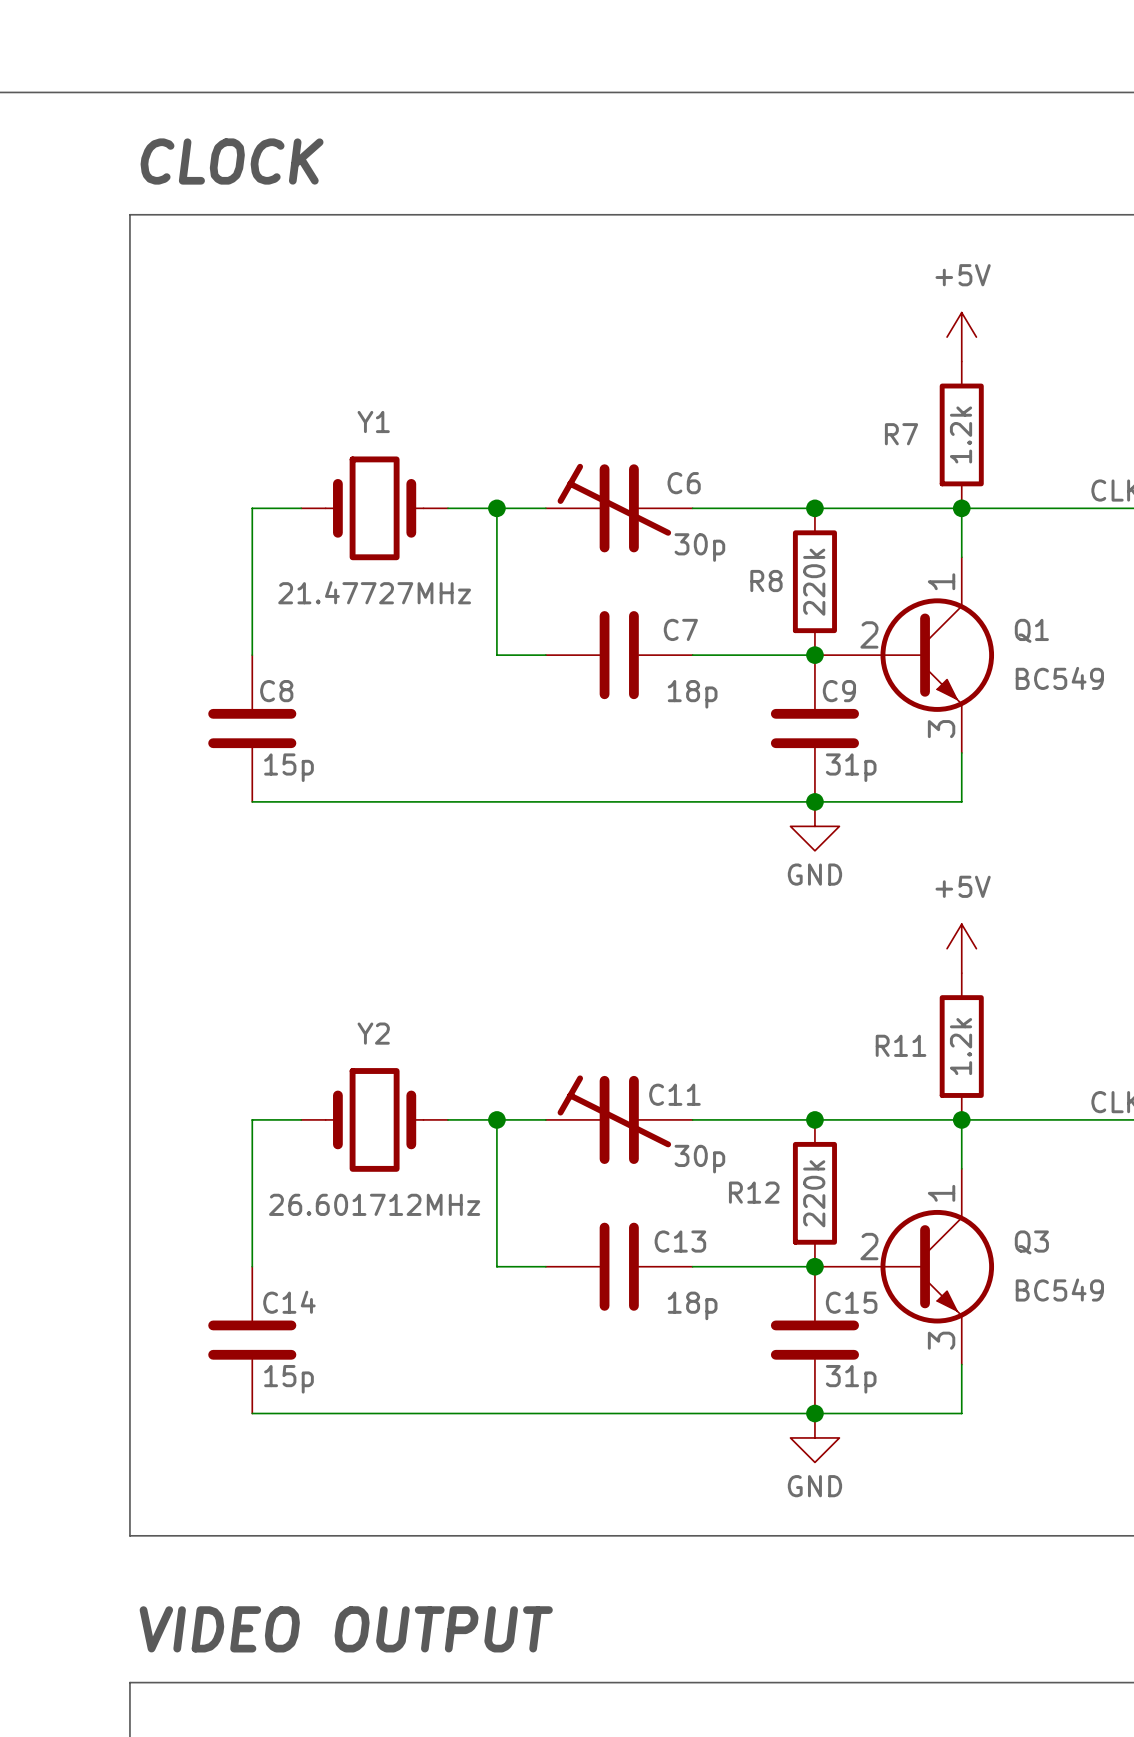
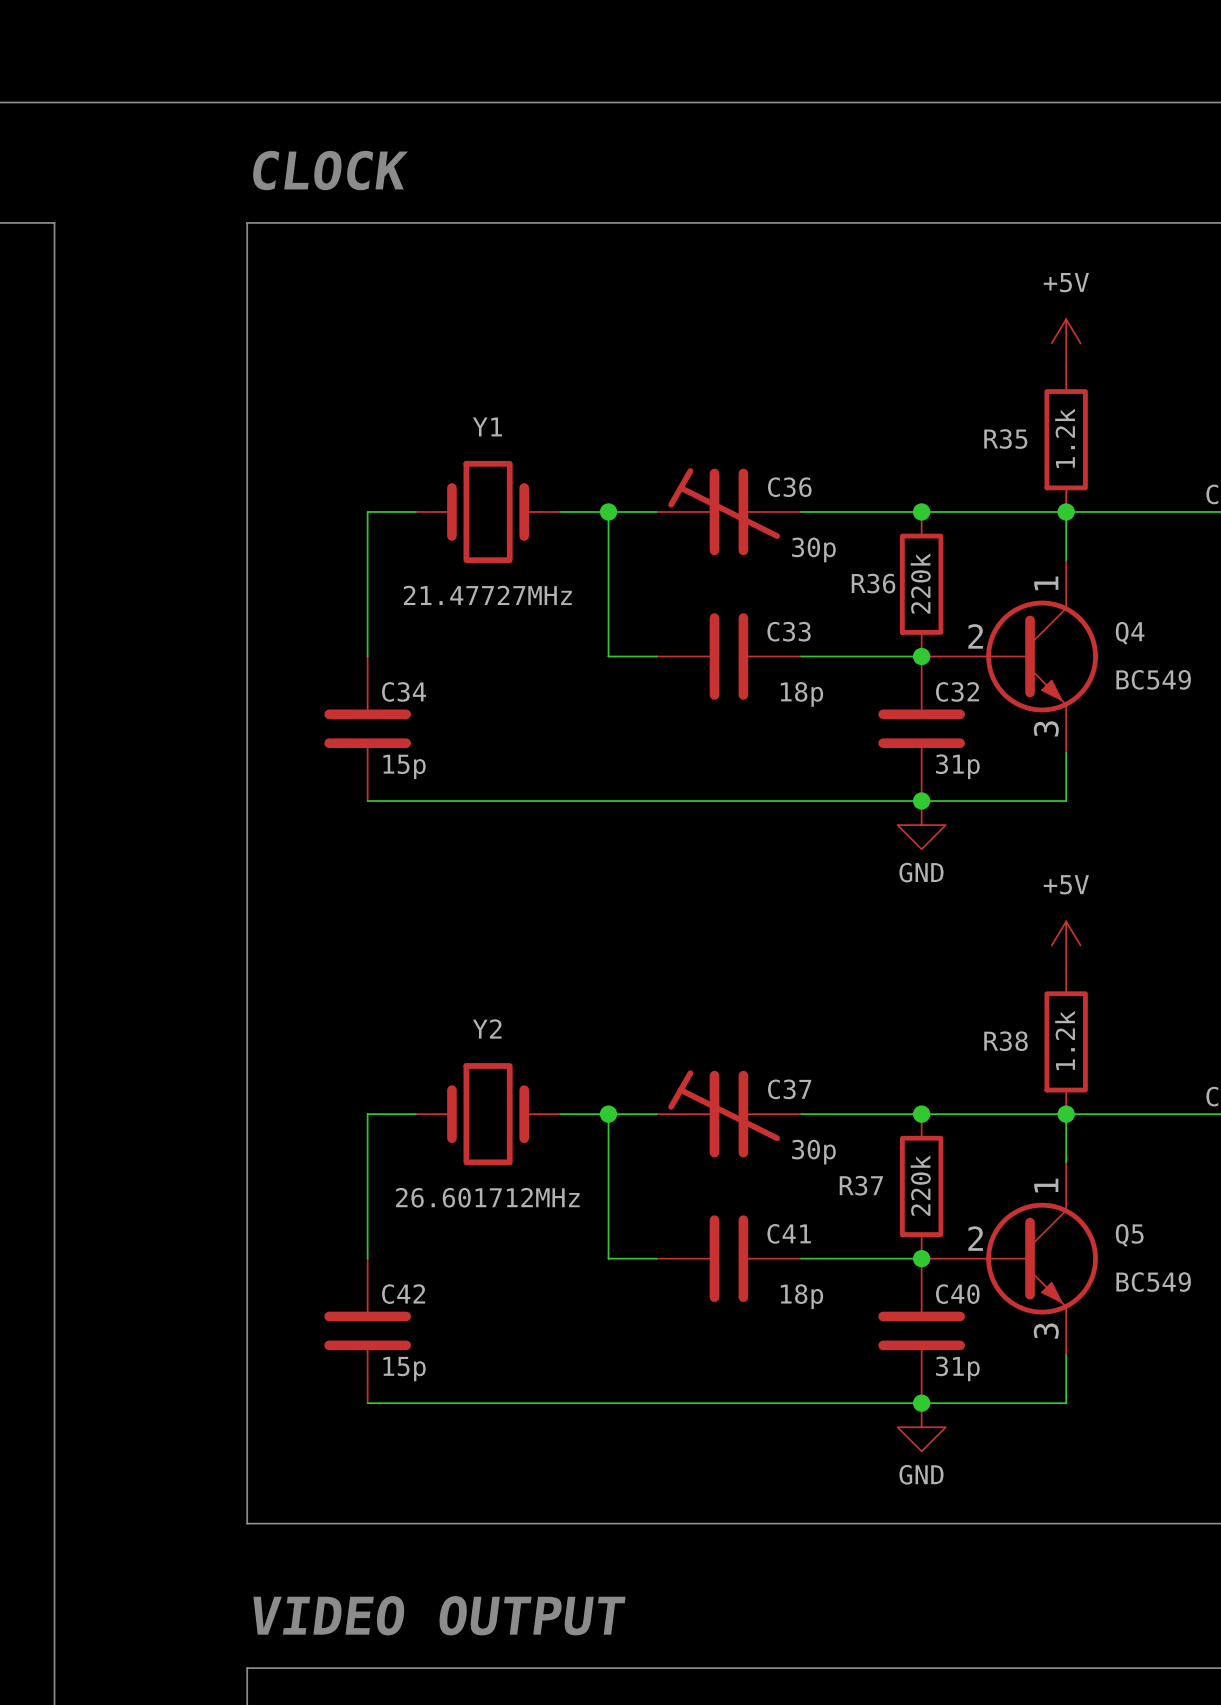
R7 name: R7 (901, 434) -> R35 (1005, 439)
C6 name: C6 (684, 483) -> C36 (789, 487)
R8 name: R8 (766, 581) -> R36 (873, 583)
C7 name: C7 (680, 629) -> C33 (789, 631)
Q1 name: Q1 (1031, 630) -> Q4 (1130, 633)
C8 name: C8 (276, 691) -> C34 (404, 691)
C9 name: C9 (839, 691) -> C32 (957, 691)
R11 name: R11 (901, 1045) -> R38 (1006, 1041)
C11 name: C11 (674, 1094) -> C37 (789, 1089)
R12 name: R12 (754, 1192) -> R37 (861, 1185)
C13 name: C13 (680, 1241) -> C41 (789, 1233)
Q3 name: Q3 (1031, 1242) -> Q5 (1129, 1235)
C14 name: C14 (289, 1302) -> C42 (403, 1294)
C15 name: C15 (851, 1302) -> C40 (957, 1294)

